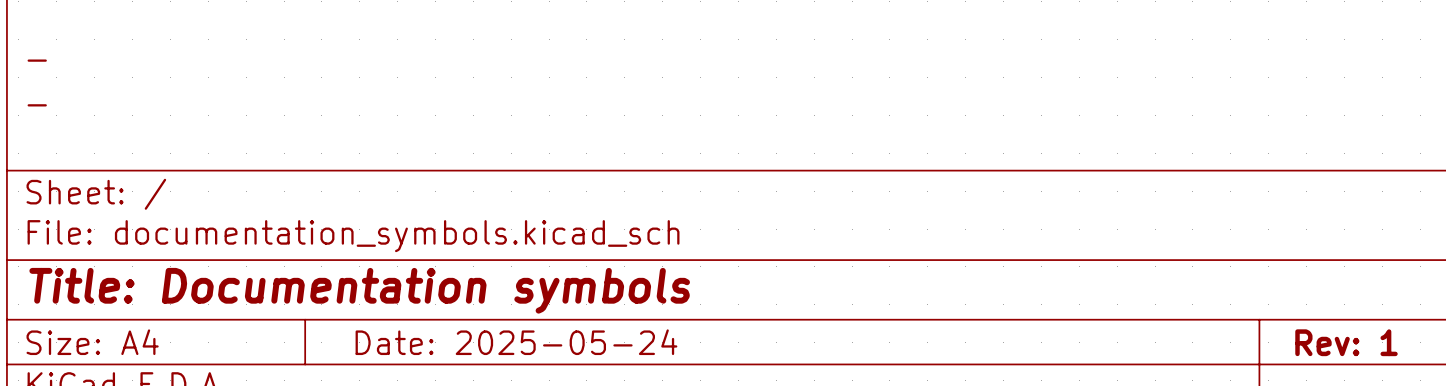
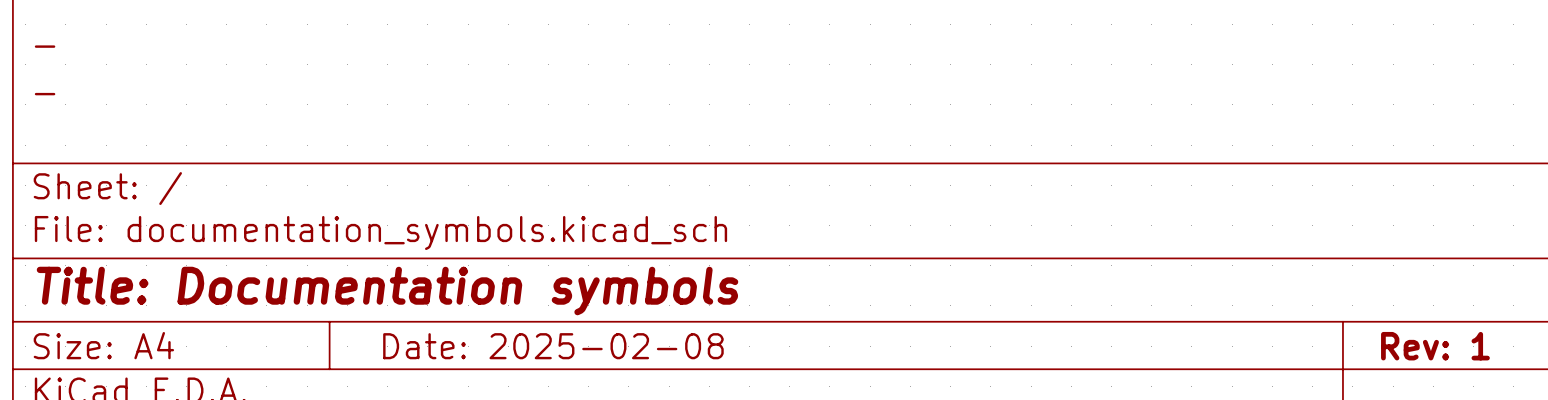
title block: Date: 2025-05-24 (516, 342) -> Date: 2025-02-08 (553, 346)

